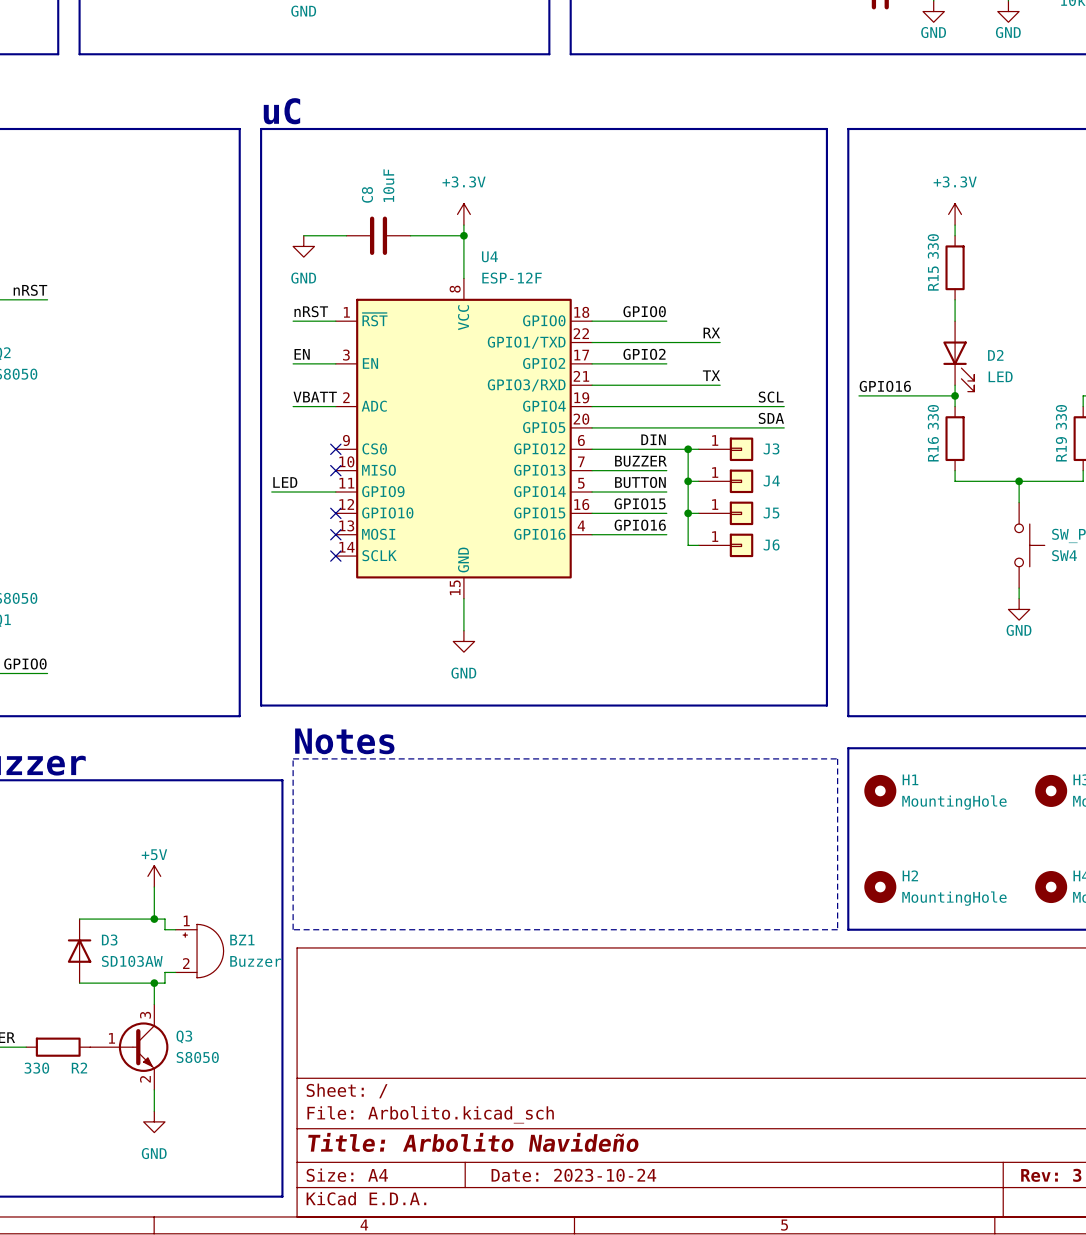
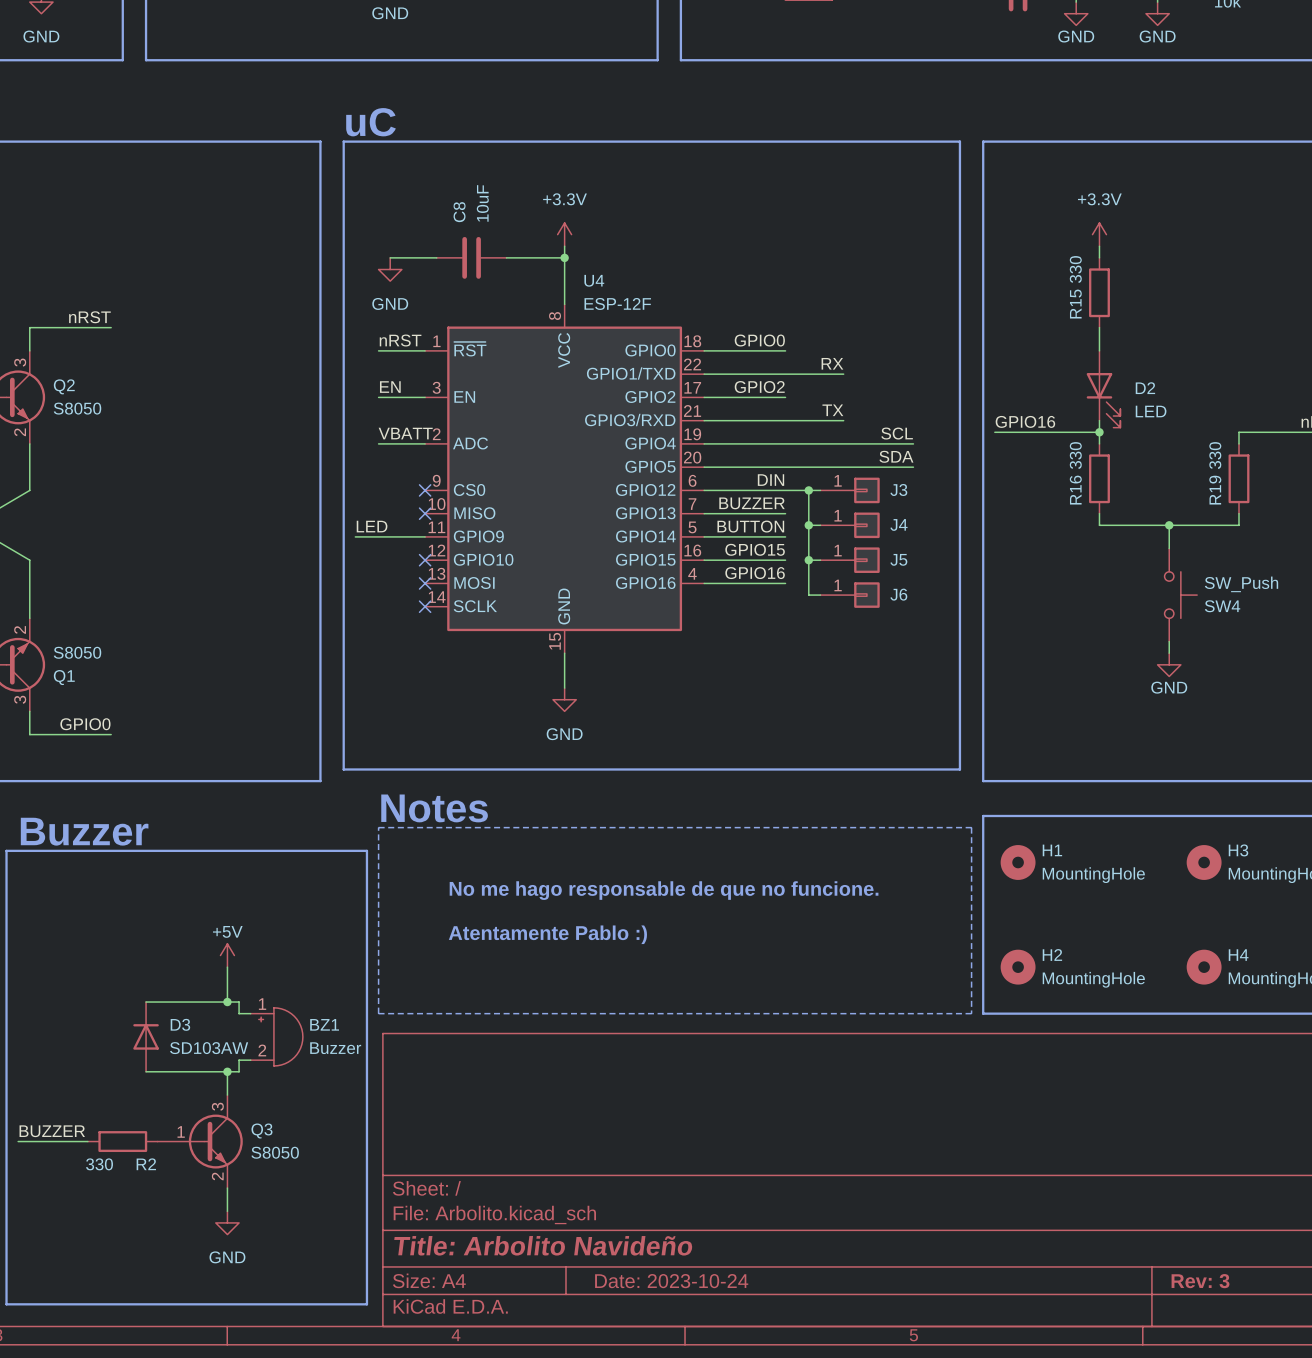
text: none -> No me hago responsable de que no funcione. (664, 890)
text: none -> Atentamente Pablo :) (547, 934)

